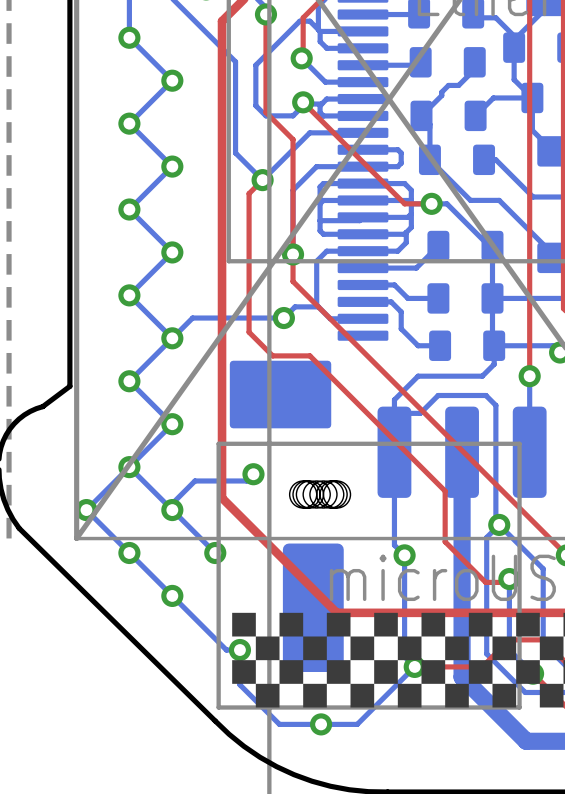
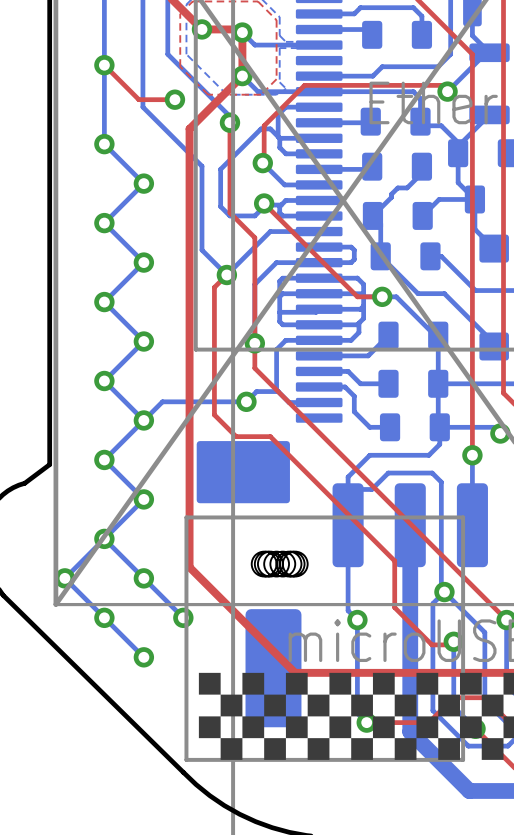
bottom track: (253, 474) (246, 480) (194, 480) (172, 503) (172, 510) -> none
via: (253, 474) -> none
bottom track: (172, 595) (226, 650) (239, 650) (239, 684) (279, 724) (357, 724) (414, 666) -> none
via: (239, 650) -> none
via: (321, 724) -> none

